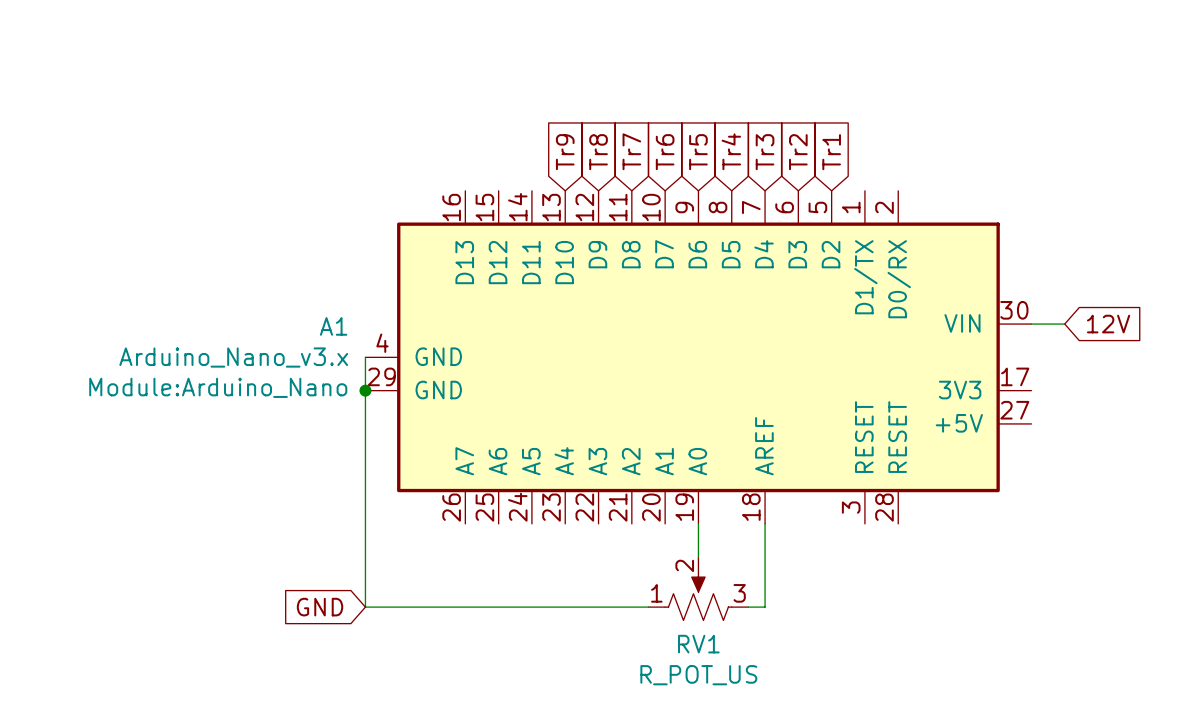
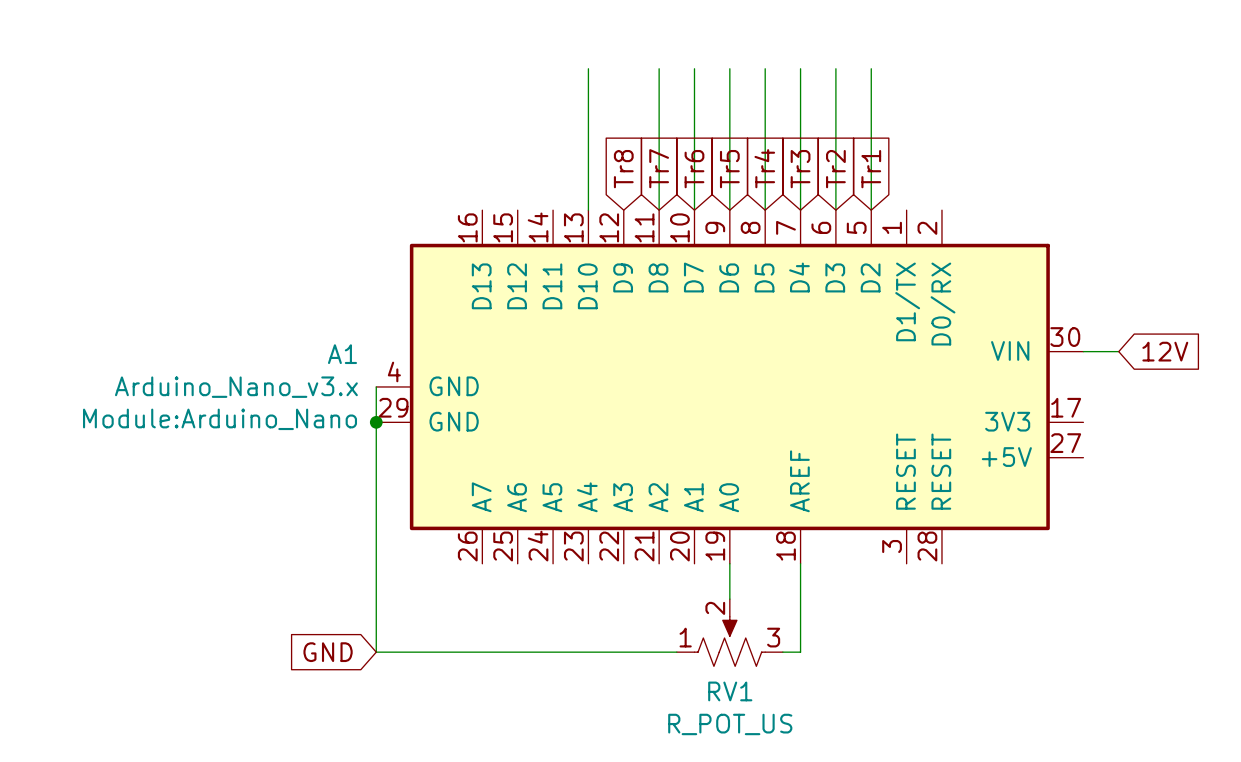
wire: none -> (588, 68) (588, 210)
wire: none -> (659, 68) (659, 210)
wire: none -> (694, 68) (694, 210)
wire: none -> (729, 68) (729, 210)
wire: none -> (765, 68) (765, 210)
wire: none -> (800, 68) (800, 210)
wire: none -> (835, 68) (835, 210)
wire: none -> (871, 68) (871, 210)
global label: Tr9 (565, 152) -> none

